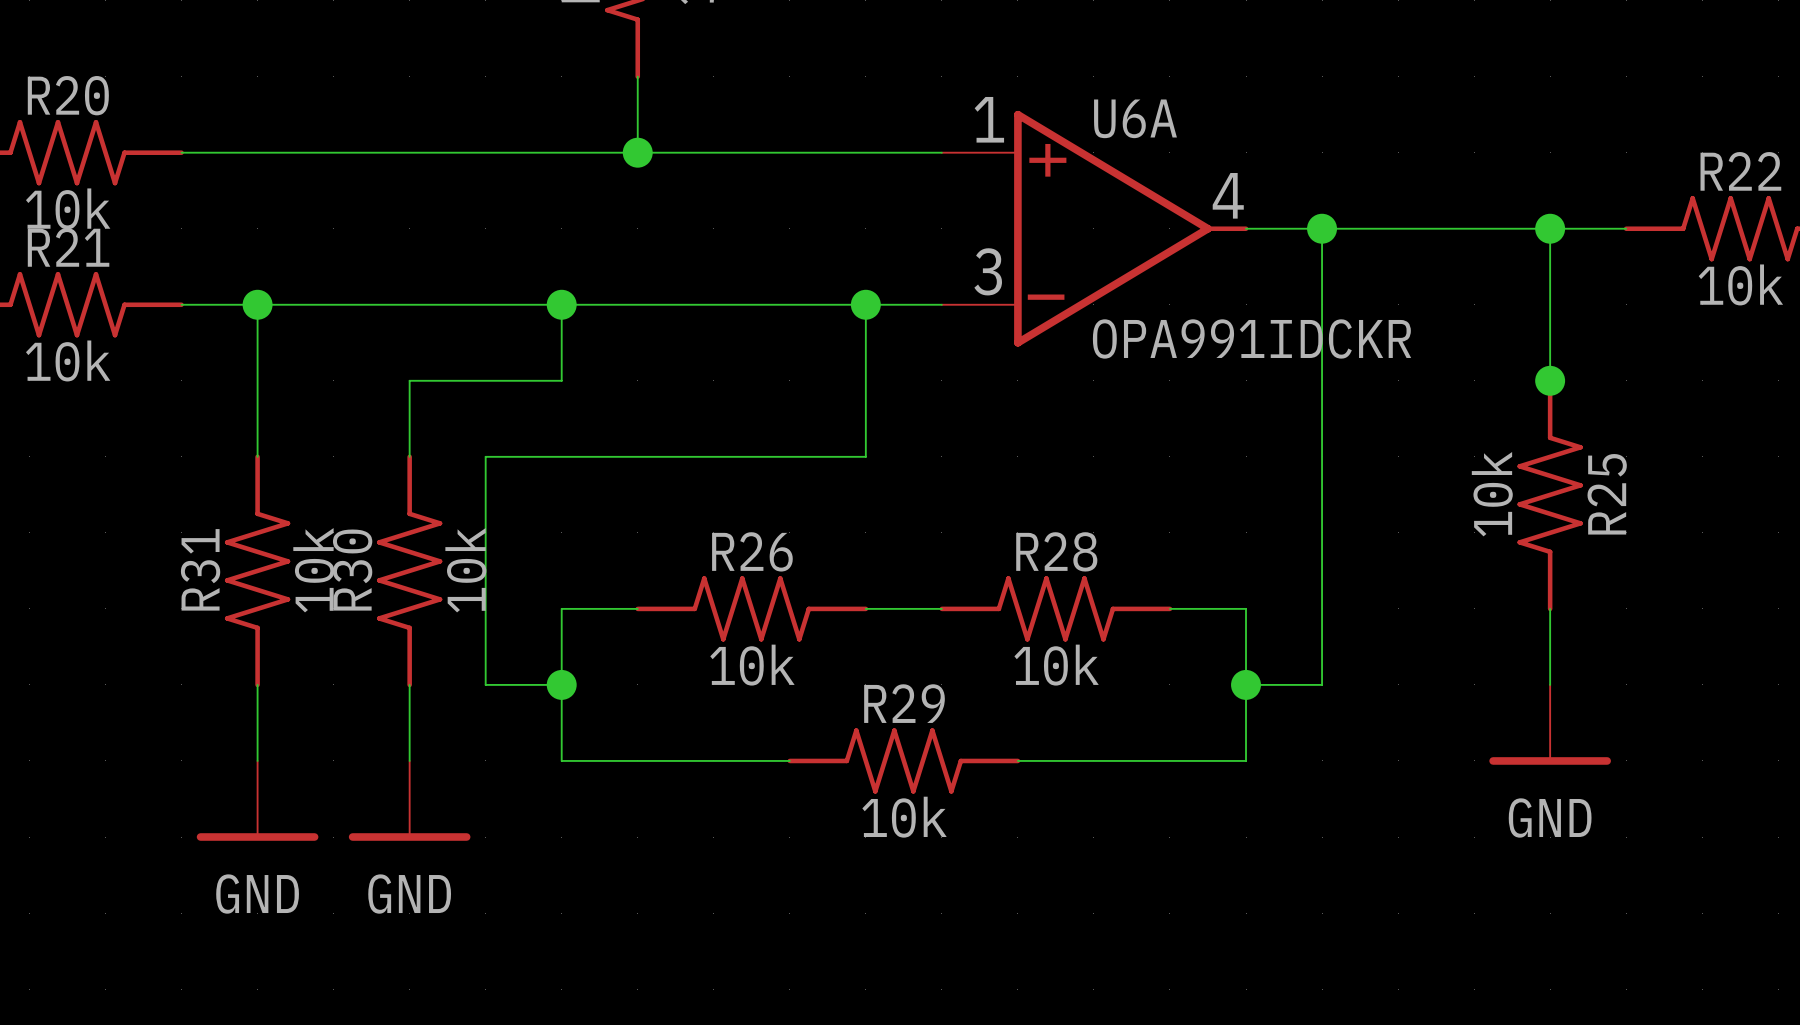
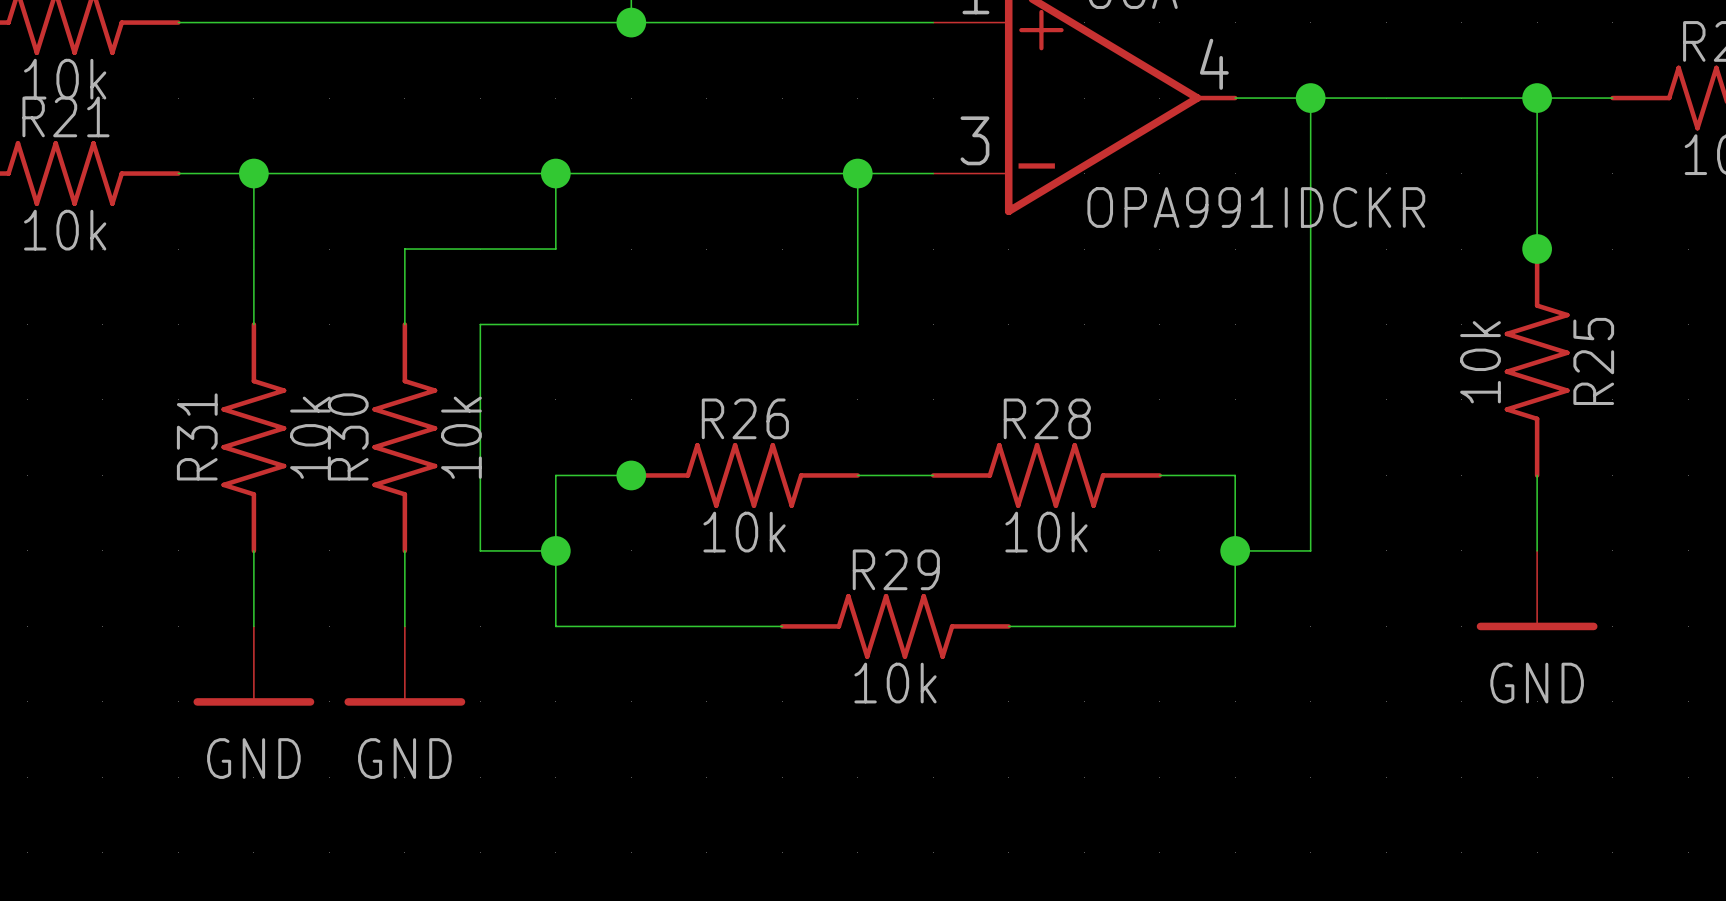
junction: none -> (631, 475)

